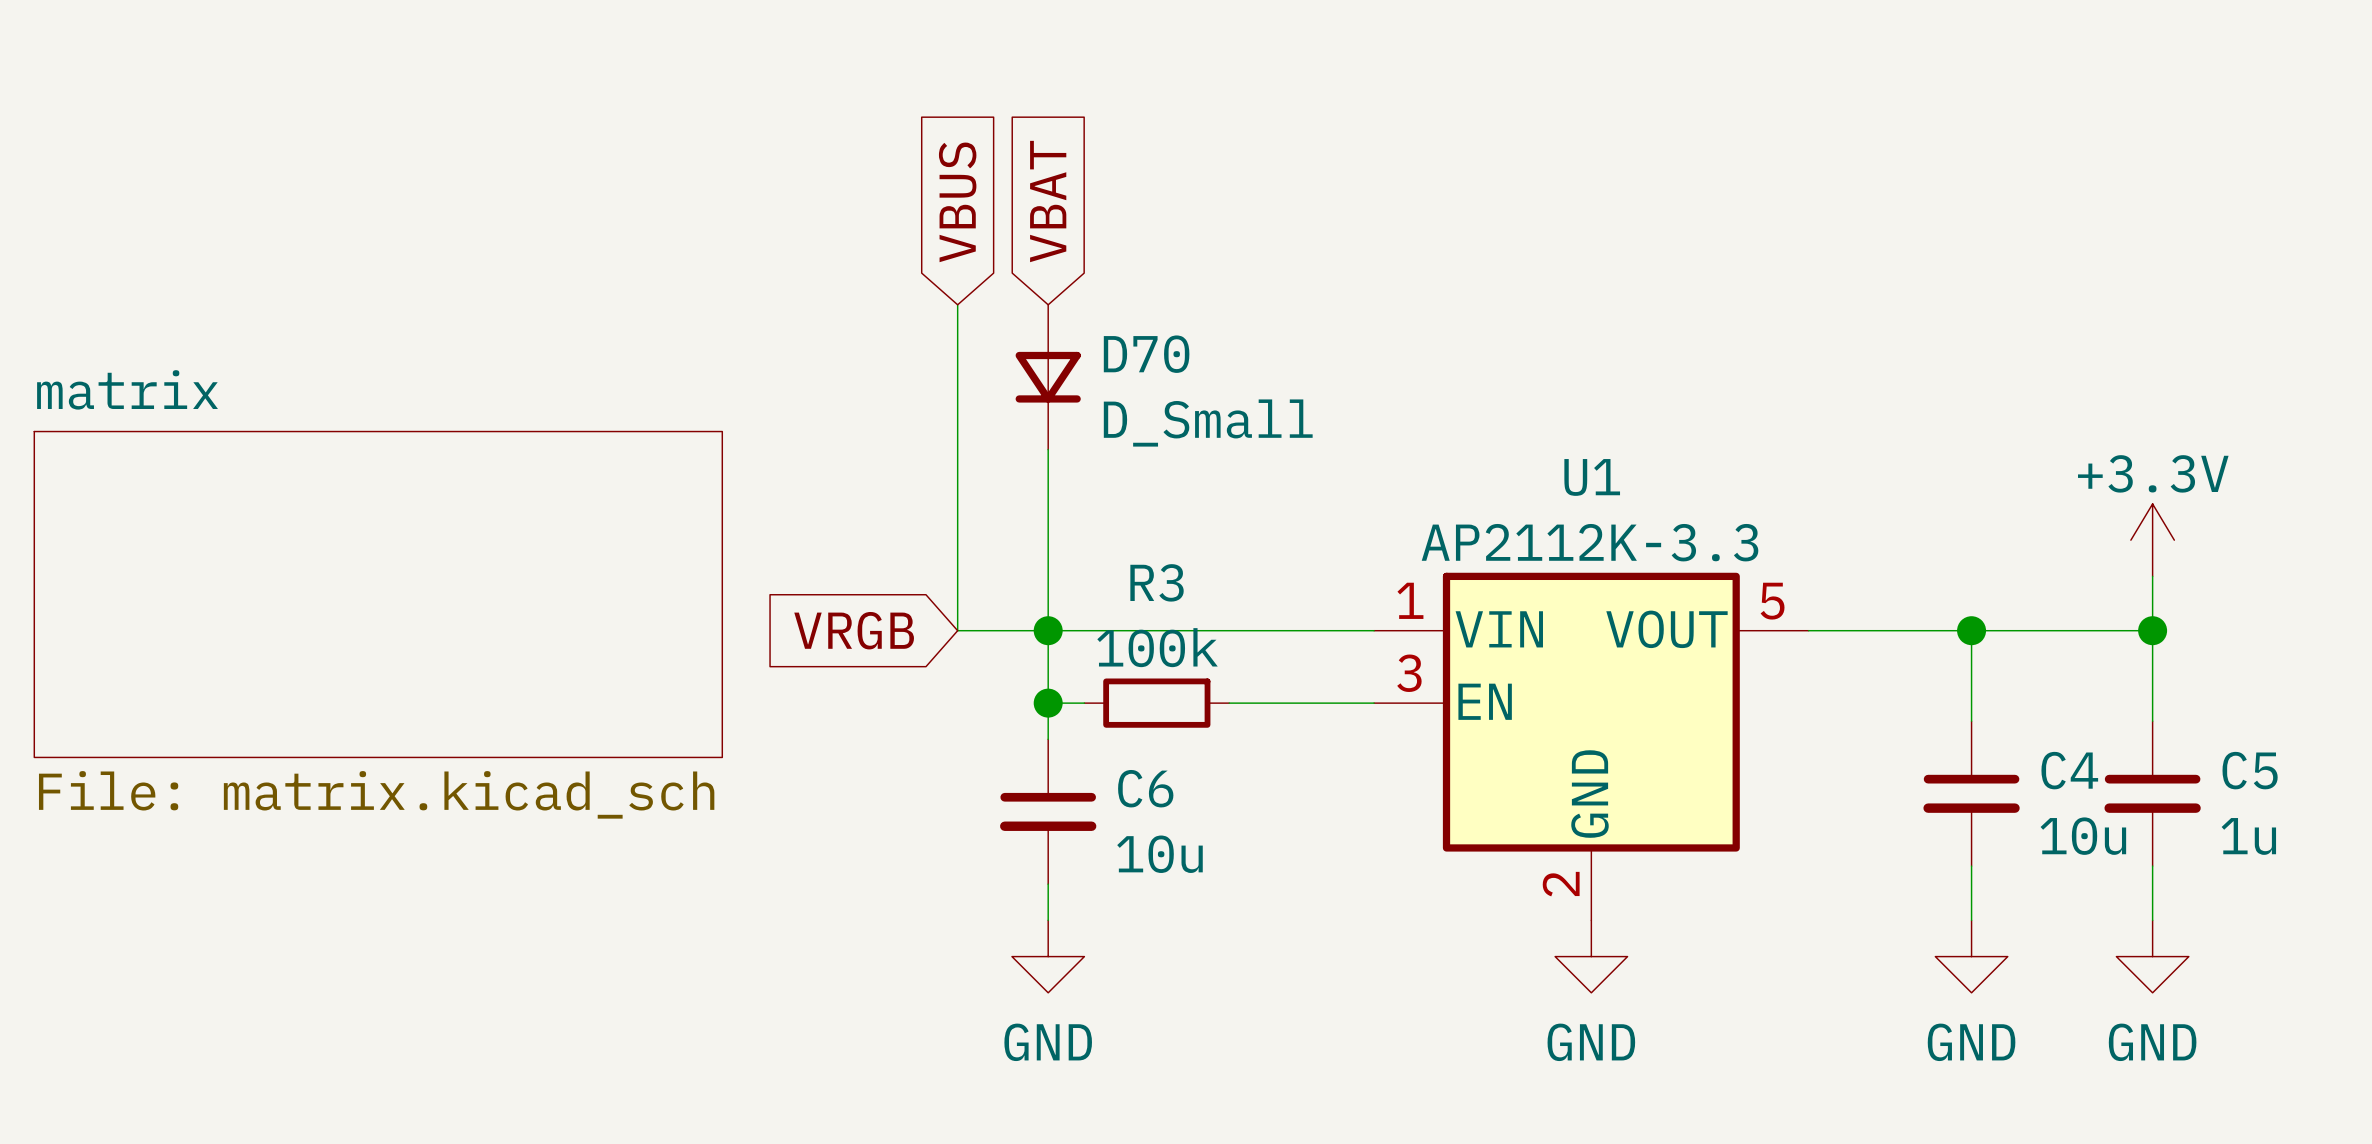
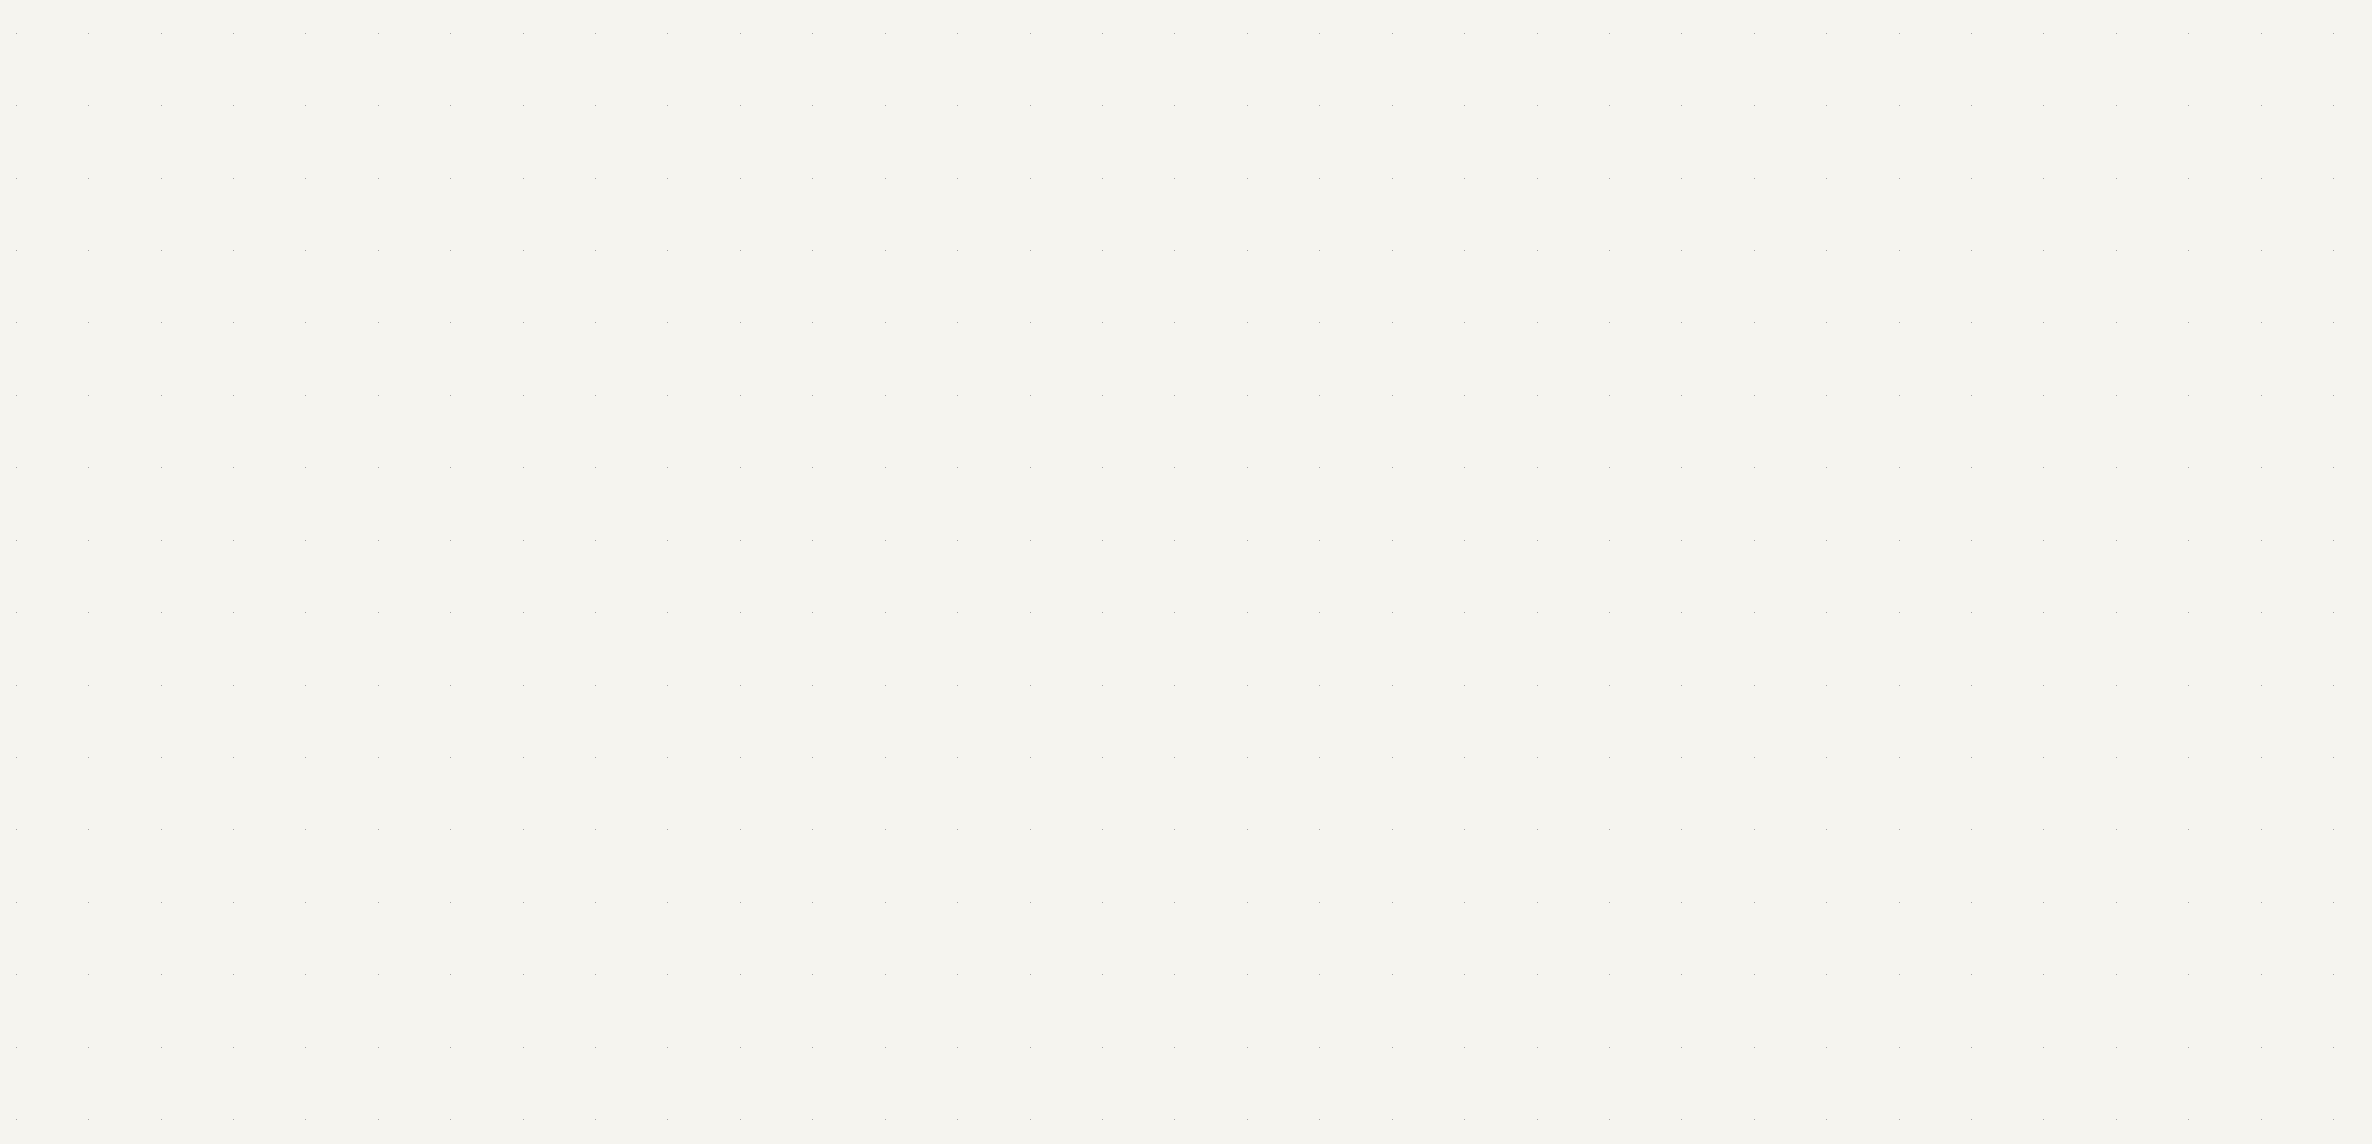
global label: VBAT (1048, 201) -> none
global label: VBUS (957, 202) -> none
wire: (957, 304) (957, 630) (1374, 630) -> none
D70: D_Small (1048, 377) -> none
wire: (1048, 449) (1048, 739) -> none
power symbol: +3.3V (2152, 540) -> none
wire: (2152, 576) (2152, 721) -> none
sheet matrix: File: matrix.kicad_sch (378, 594) -> none
global label: VRGB (854, 630) -> none
junction: (1048, 630) -> none
wire: (1808, 630) (2152, 630) -> none
wire: (1971, 630) (1971, 721) -> none
junction: (1971, 630) -> none
junction: (2152, 630) -> none
wire: (1048, 703) (1084, 703) -> none
junction: (1048, 703) -> none
R3: 100k (1156, 703) -> none
wire: (1229, 703) (1374, 703) -> none
U1: AP2112K-3.3 (1591, 746) -> none
C4: 10u (1971, 793) -> none
C5: 1u (2152, 793) -> none
C6: 10u (1048, 811) -> none
wire: (1971, 866) (1971, 920) -> none
wire: (2152, 866) (2152, 920) -> none
wire: (1048, 884) (1048, 920) -> none
power symbol: GND (1048, 956) -> none
power symbol: GND (1591, 956) -> none
power symbol: GND (1971, 956) -> none
power symbol: GND (2152, 956) -> none

